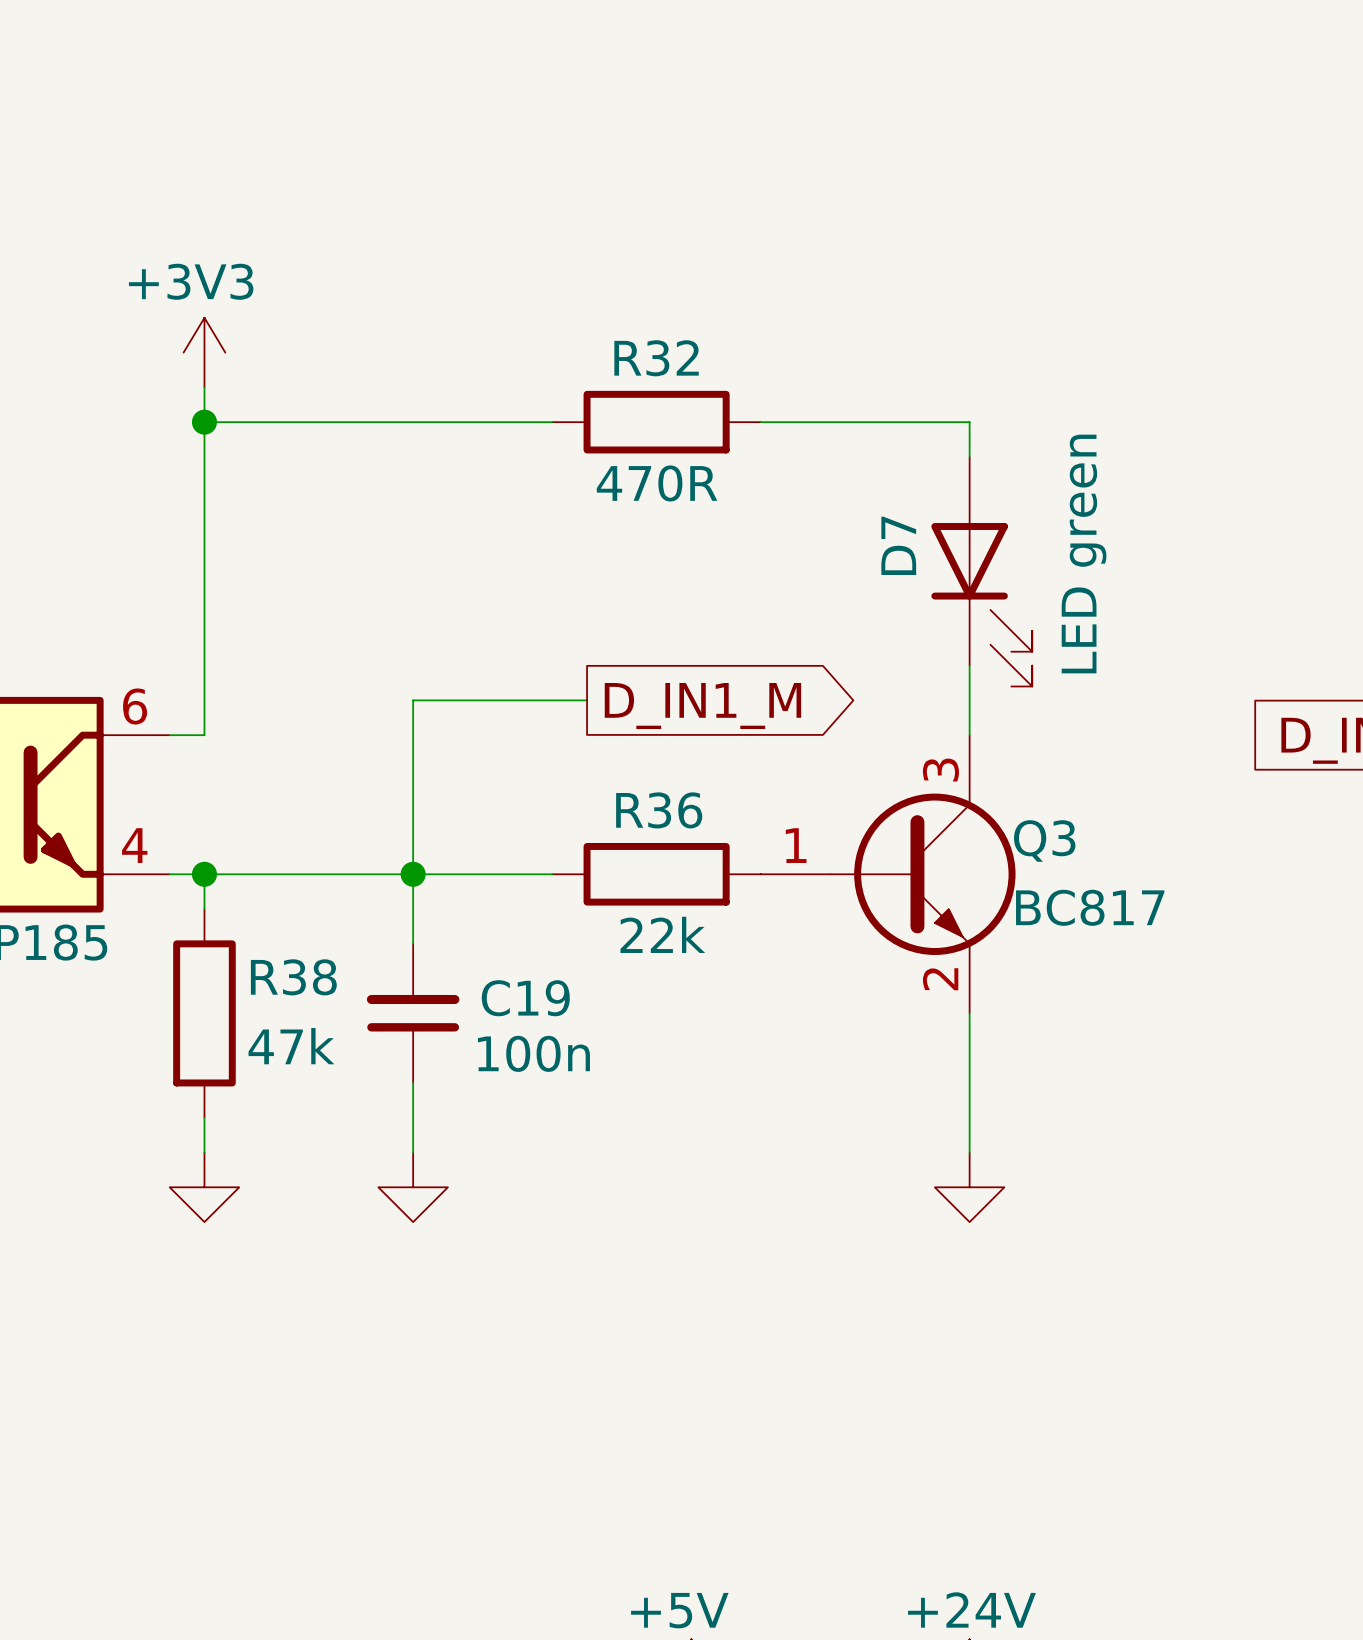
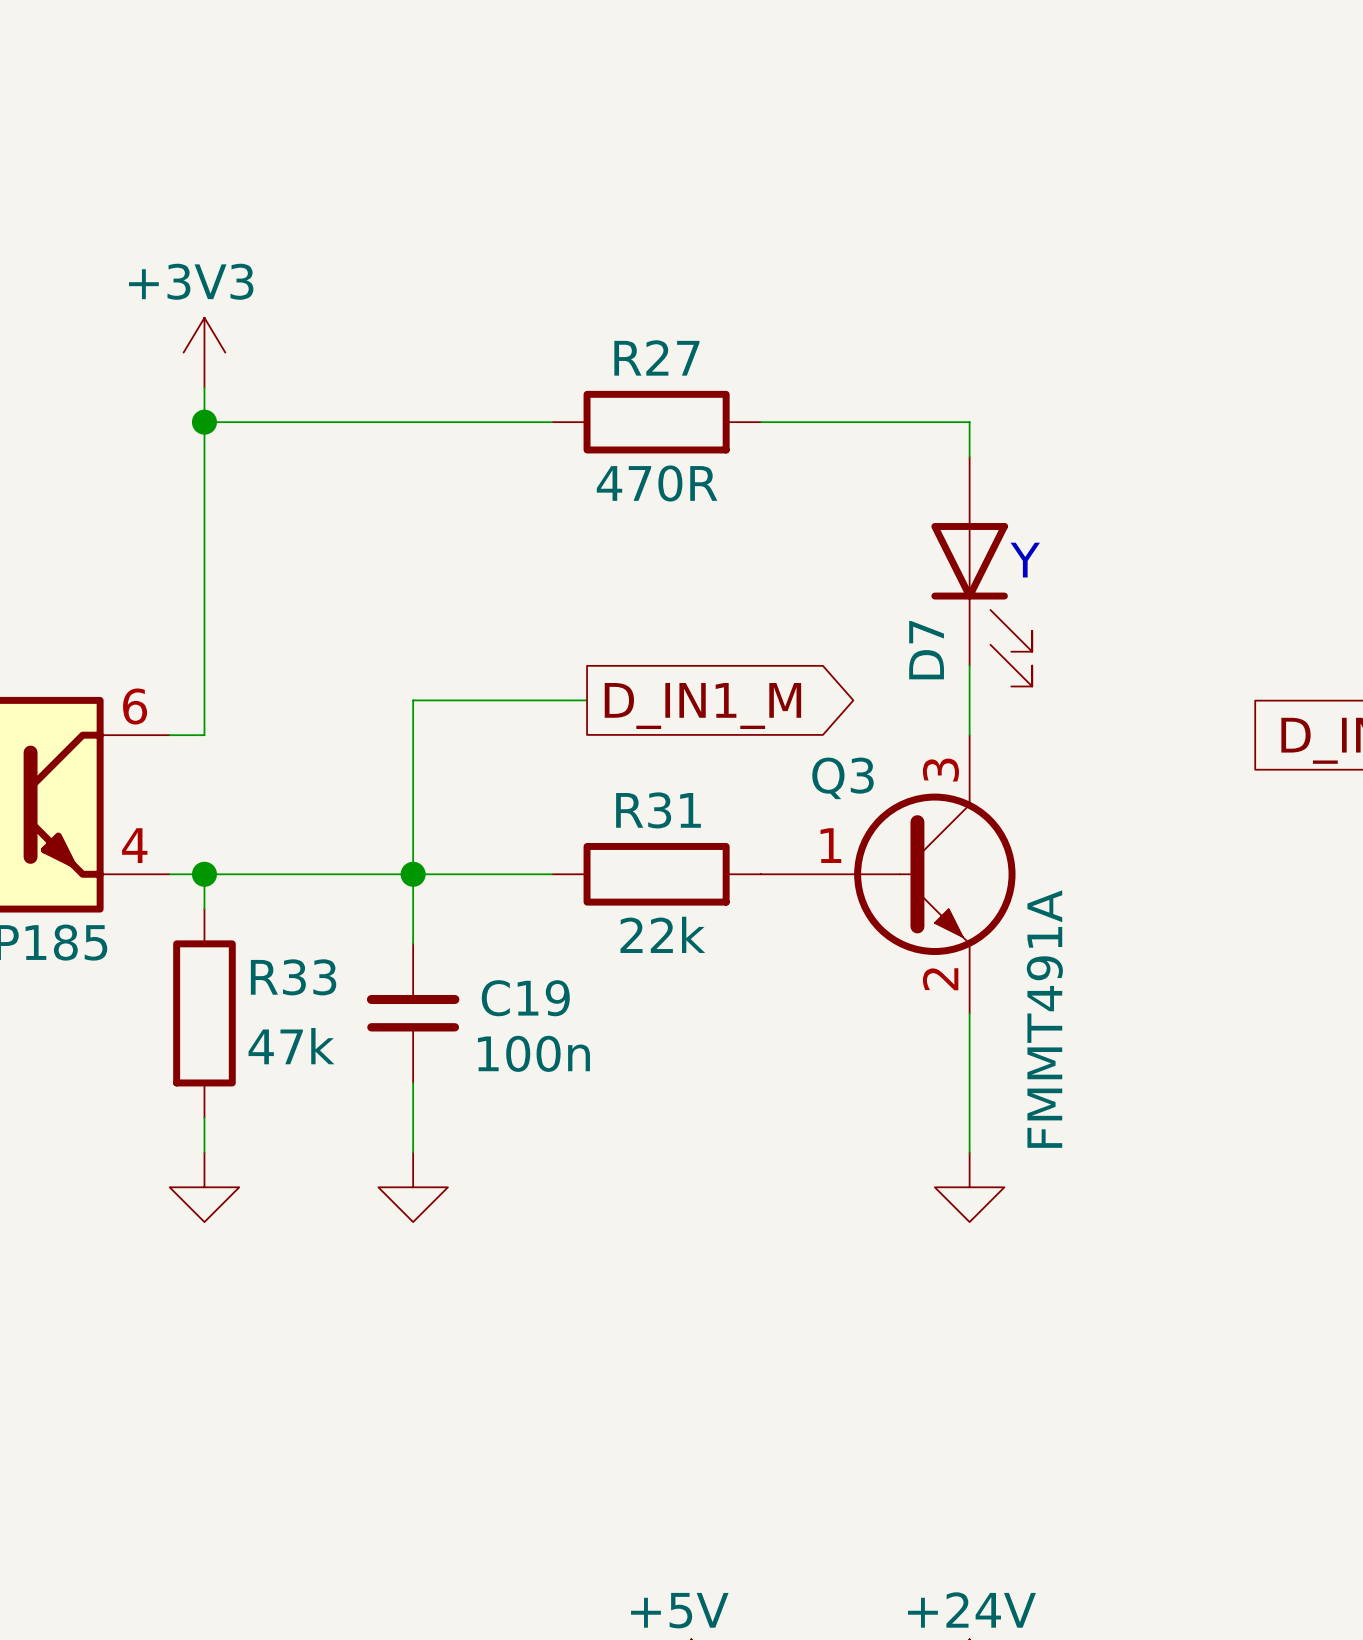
R32 name: R32 (656, 358) -> R27 (656, 357)
D7 name position: D7 (898, 545) -> D7 (926, 650)
D7 value: LED green (1084, 554) -> none
text: none -> Y (1025, 560)
Q3 symbol: [760, 735, 1016, 1014] -> [760, 735, 1016, 1014]
R36 name: R36 (659, 810) -> R31 (658, 810)
Q3 name position: Q3 (1044, 840) -> Q3 (843, 778)
Q3 value: BC817 (1090, 907) -> FMMT491A (1044, 1019)
R38 name: R38 (293, 977) -> R33 (293, 977)

